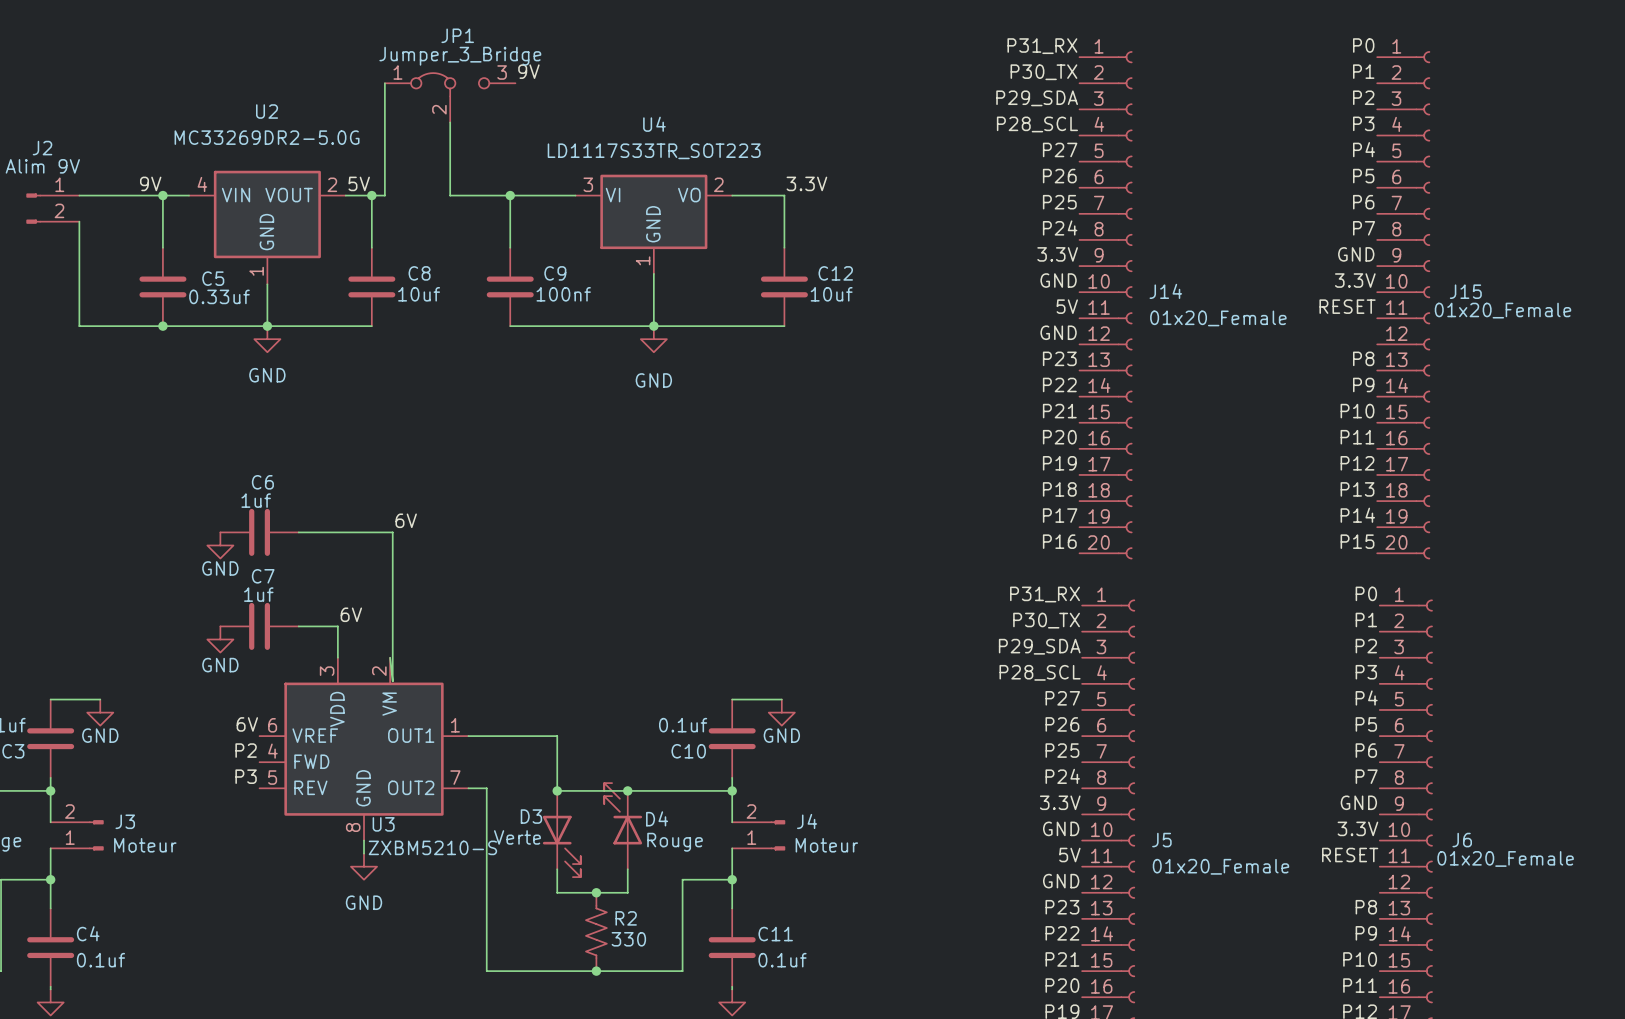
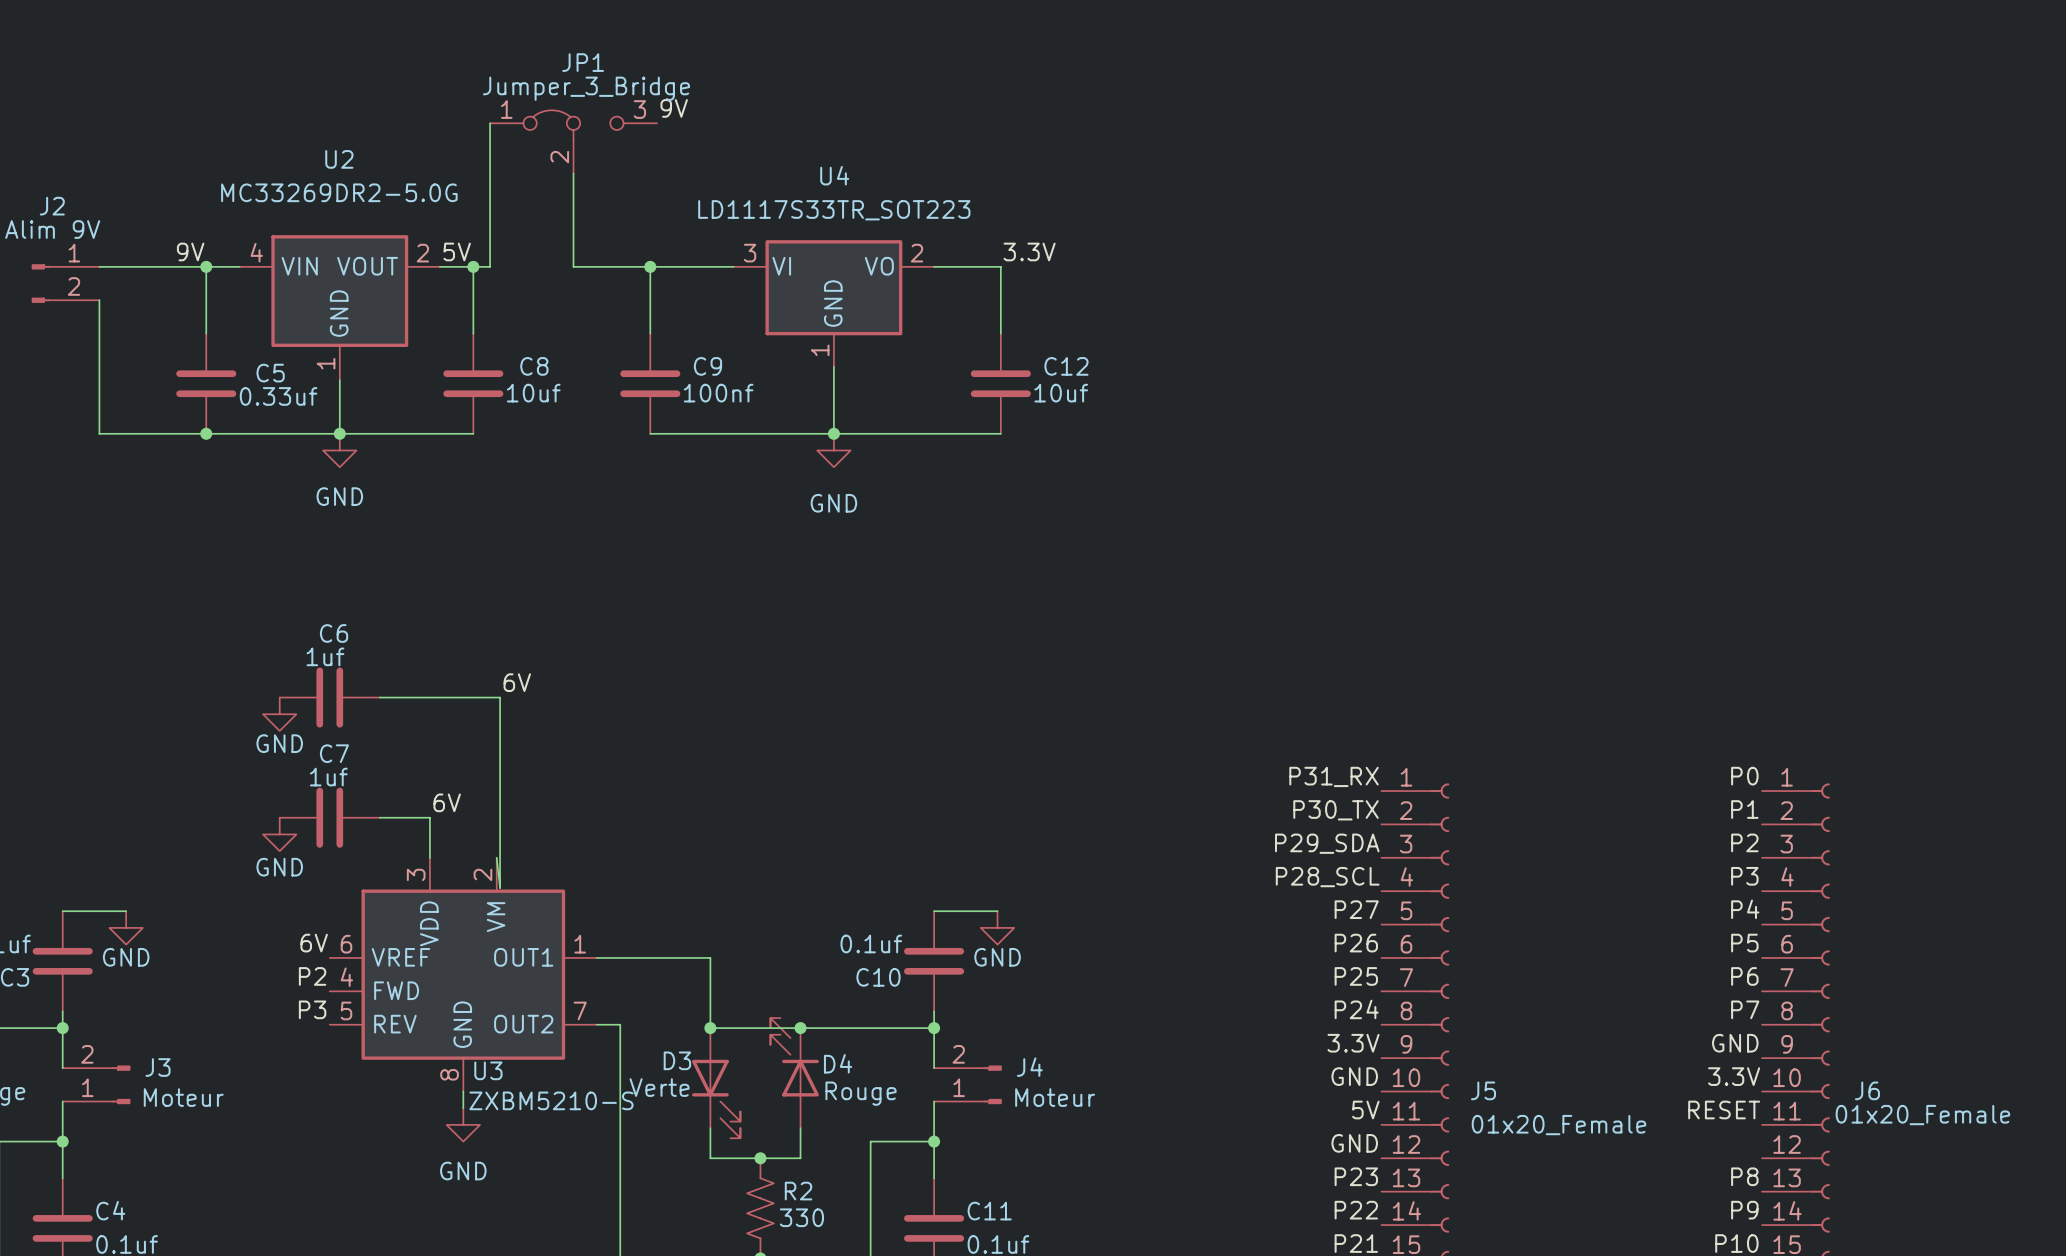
label: P0 (1363, 45) -> none
label: P31_RX (1042, 46) -> none
label: P1 (1363, 71) -> none
label: P30_TX (1043, 72) -> none
label: P2 (1363, 97) -> none
label: P29_SDA (1037, 98) -> none
label: P3 (1363, 123) -> none
label: P28_SCL (1037, 124) -> none
label: P27 (1060, 149) -> none
label: P4 (1364, 149) -> none
label: P26 (1059, 176) -> none
label: P5 (1363, 176) -> none
label: P25 (1059, 202) -> none
label: P6 (1363, 202) -> none
label: P24 (1060, 227) -> none
label: P7 (1364, 228) -> none
label: 3.3V (1057, 254) -> none
label: GND (1356, 254) -> none
label: GND (1058, 280) -> none
label: 3.3V (1355, 280) -> none
J14: 01x20_Female (1106, 305) -> none
J15: 01x20_Female (1403, 305) -> none
label: 5V (1067, 306) -> none
label: RESET (1347, 306) -> none
label: GND (1058, 332) -> none
label: P23 (1059, 358) -> none
label: P8 (1363, 358) -> none
label: P22 (1059, 384) -> none
label: P9 (1363, 384) -> none
label: P21 (1059, 411) -> none
label: P10 (1357, 411) -> none
label: P20 (1059, 437) -> none
label: P11 (1357, 437) -> none
label: P19 (1059, 463) -> none
label: P12 (1357, 463) -> none
label: P18 (1059, 489) -> none
label: P13 (1357, 489) -> none
label: P17 (1060, 515) -> none
label: P14 (1357, 515) -> none
label: P16 (1059, 541) -> none
label: P15 (1357, 541) -> none

